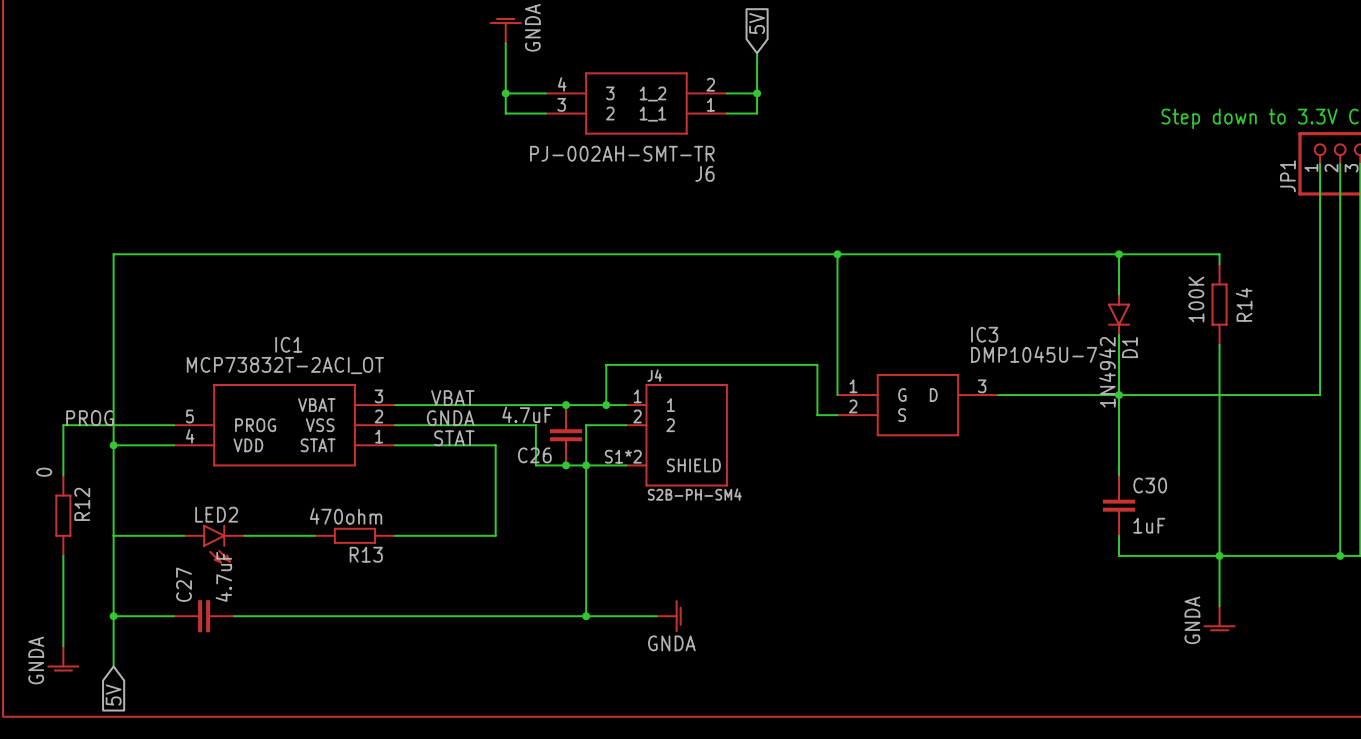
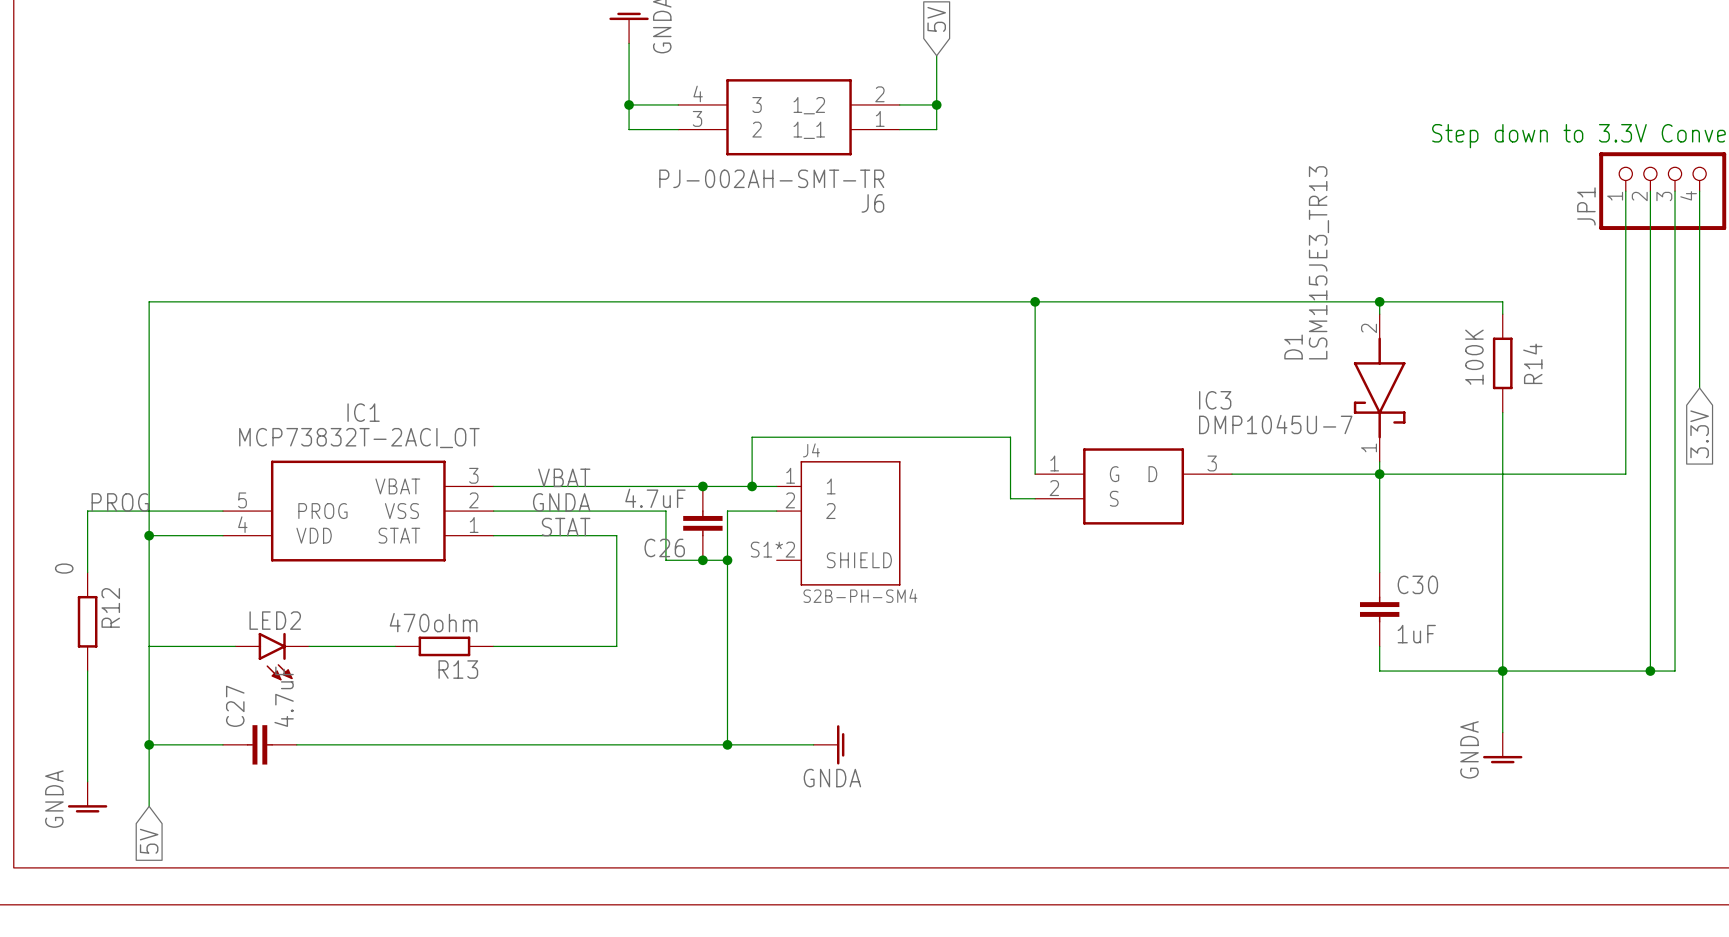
D1 symbol: [1107, 293, 1131, 336] -> [1353, 314, 1406, 462]
D1 name position: D1 (1129, 347) -> D1 (1293, 346)
D1 value: 1N4942 (1107, 372) -> LSM115JE3_TR13 (1318, 262)
wire: (586, 465) (626, 465) -> none

